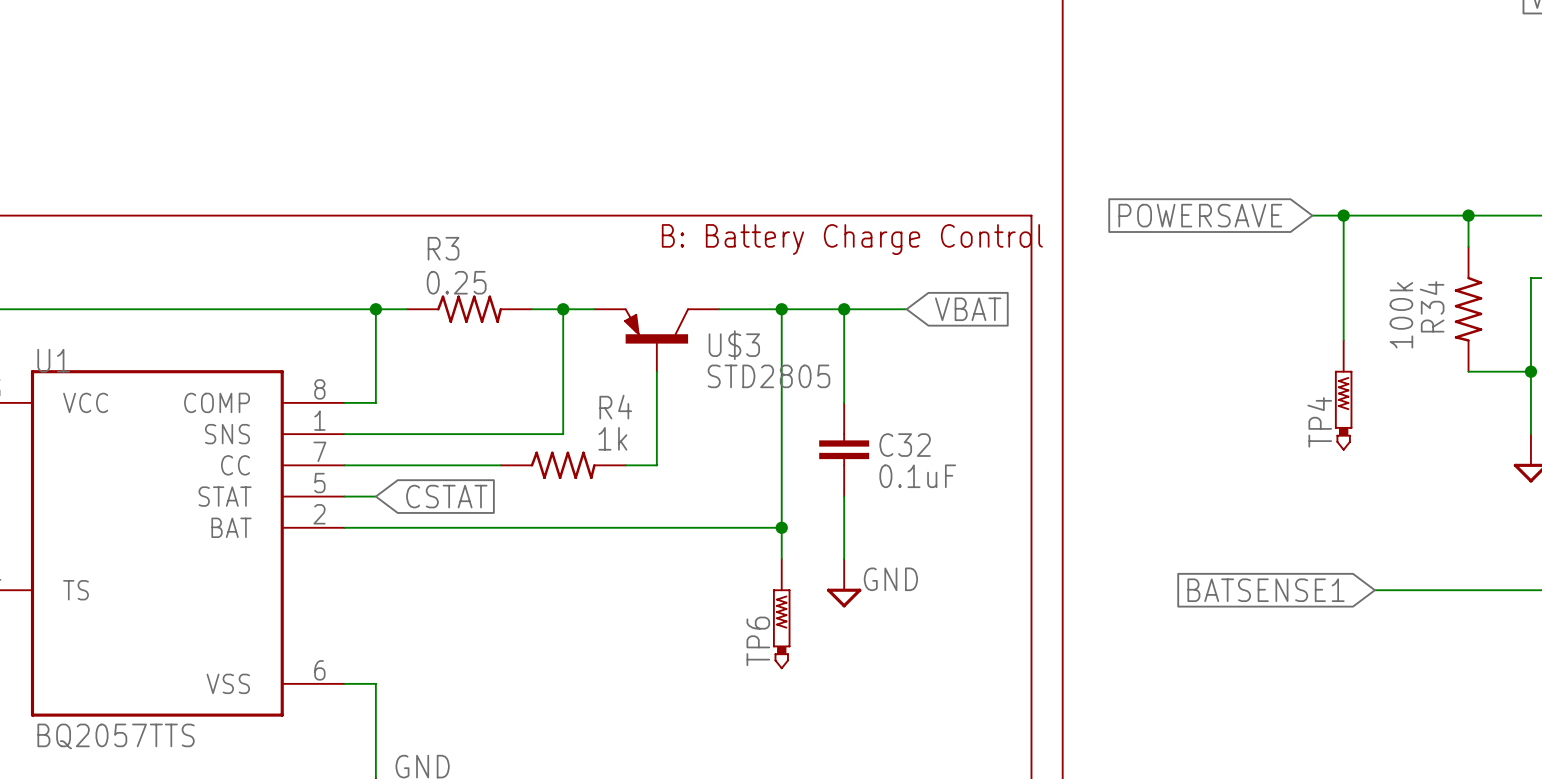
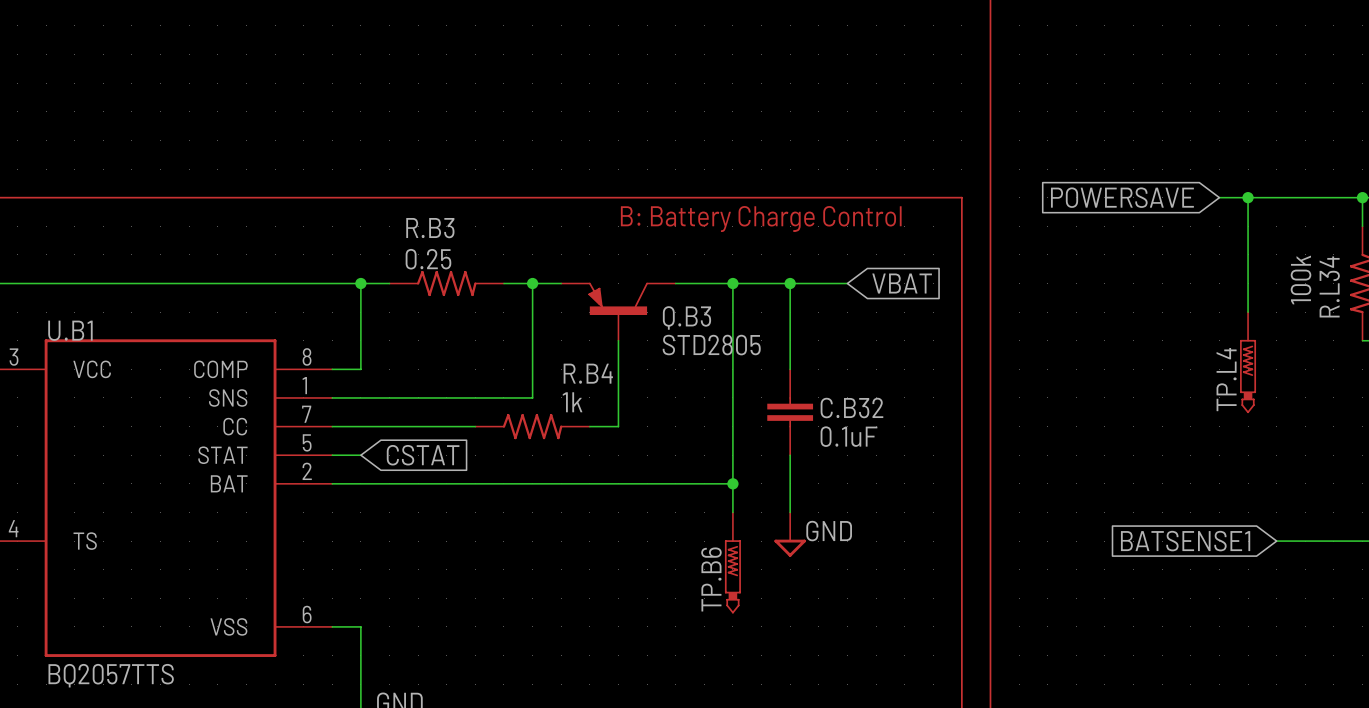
R3 name: R3 (443, 248) -> R.B3 (430, 228)
R34 name: R34 (1432, 306) -> R.L34 (1329, 286)
U$3 name: U$3 (734, 345) -> Q.B3 (686, 317)
U1 name: U1 (53, 360) -> U.B1 (70, 330)
R4 name: R4 (615, 407) -> R.B4 (588, 373)
TP4 name: TP4 (1319, 422) -> TP.L4 (1226, 379)
C32 name: C32 (905, 445) -> C.B32 (851, 408)
TP6 name: TP6 (758, 641) -> TP.B6 (711, 579)

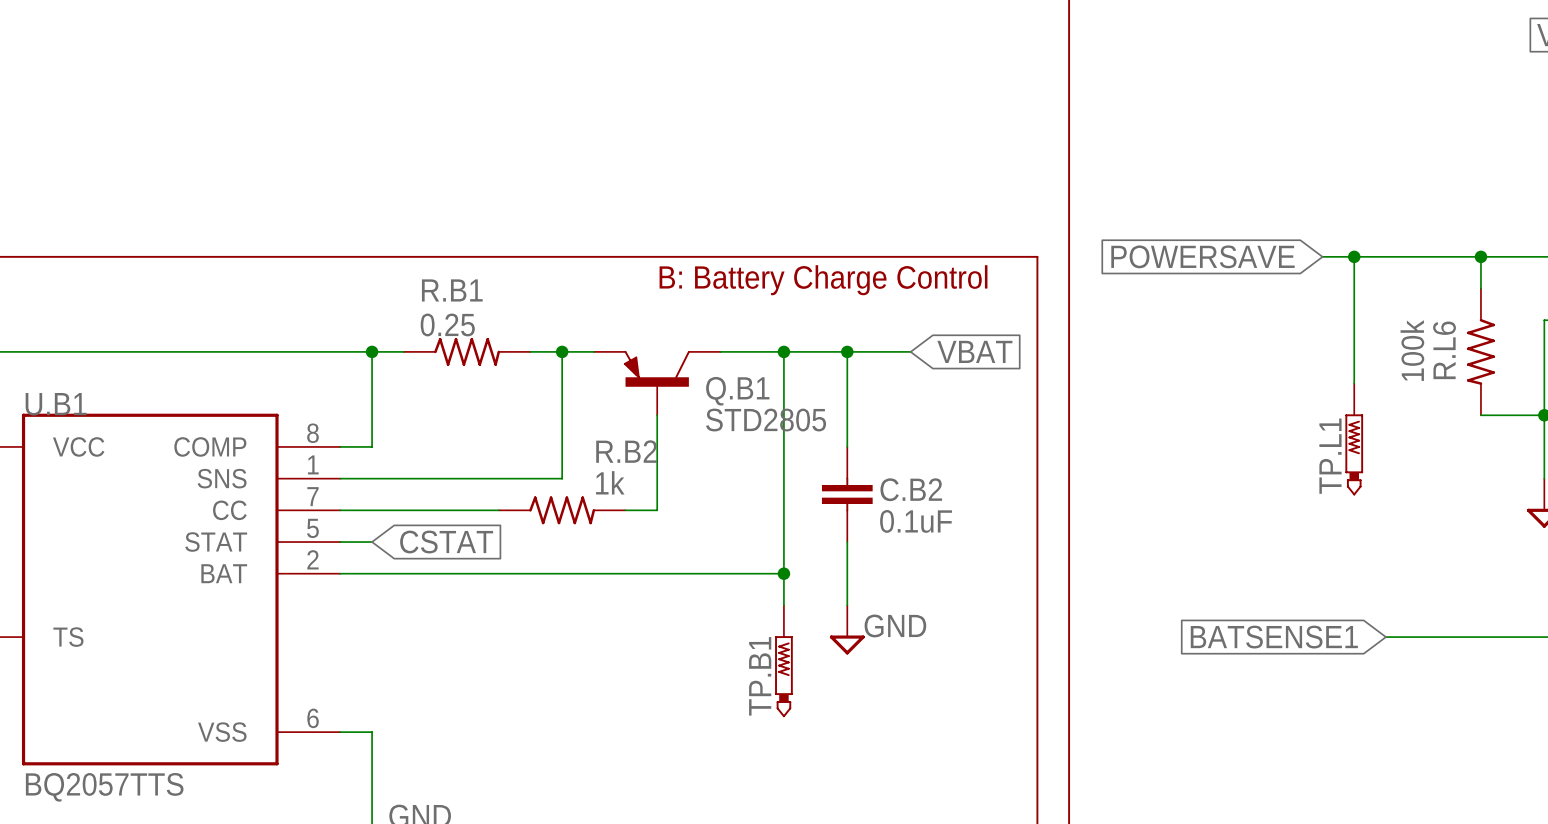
R.B3 name: R.B3 (430, 228) -> R.B1 (452, 290)
R.L34 name: R.L34 (1329, 286) -> R.L6 (1444, 350)
Q.B3 name: Q.B3 (686, 317) -> Q.B1 (737, 391)
R.B4 name: R.B4 (588, 373) -> R.B2 (626, 451)
TP.L4 name: TP.L4 (1226, 379) -> TP.L1 (1330, 456)
C.B32 name: C.B32 (851, 408) -> C.B2 (911, 489)
TP.B6 name: TP.B6 (711, 579) -> TP.B1 (760, 676)

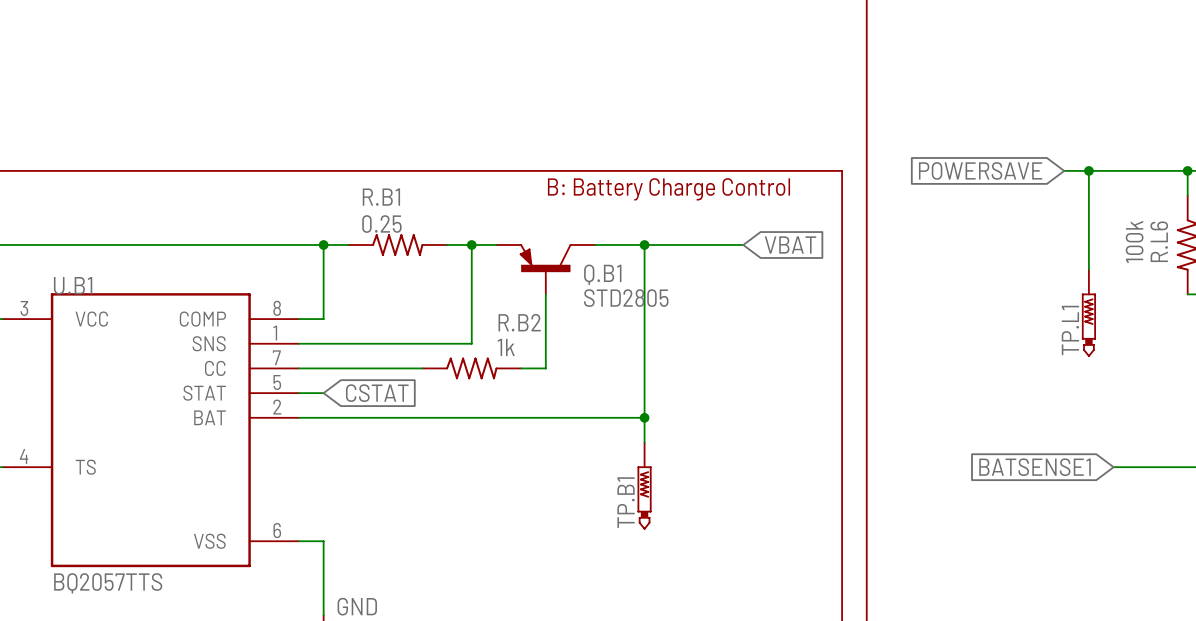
wire: (847, 351) (847, 446) -> none
junction: (847, 351) -> none
C.B2: 0.1uF (847, 494) -> none
wire: (847, 542) (847, 605) -> none
power symbol: GND (847, 629) -> none

